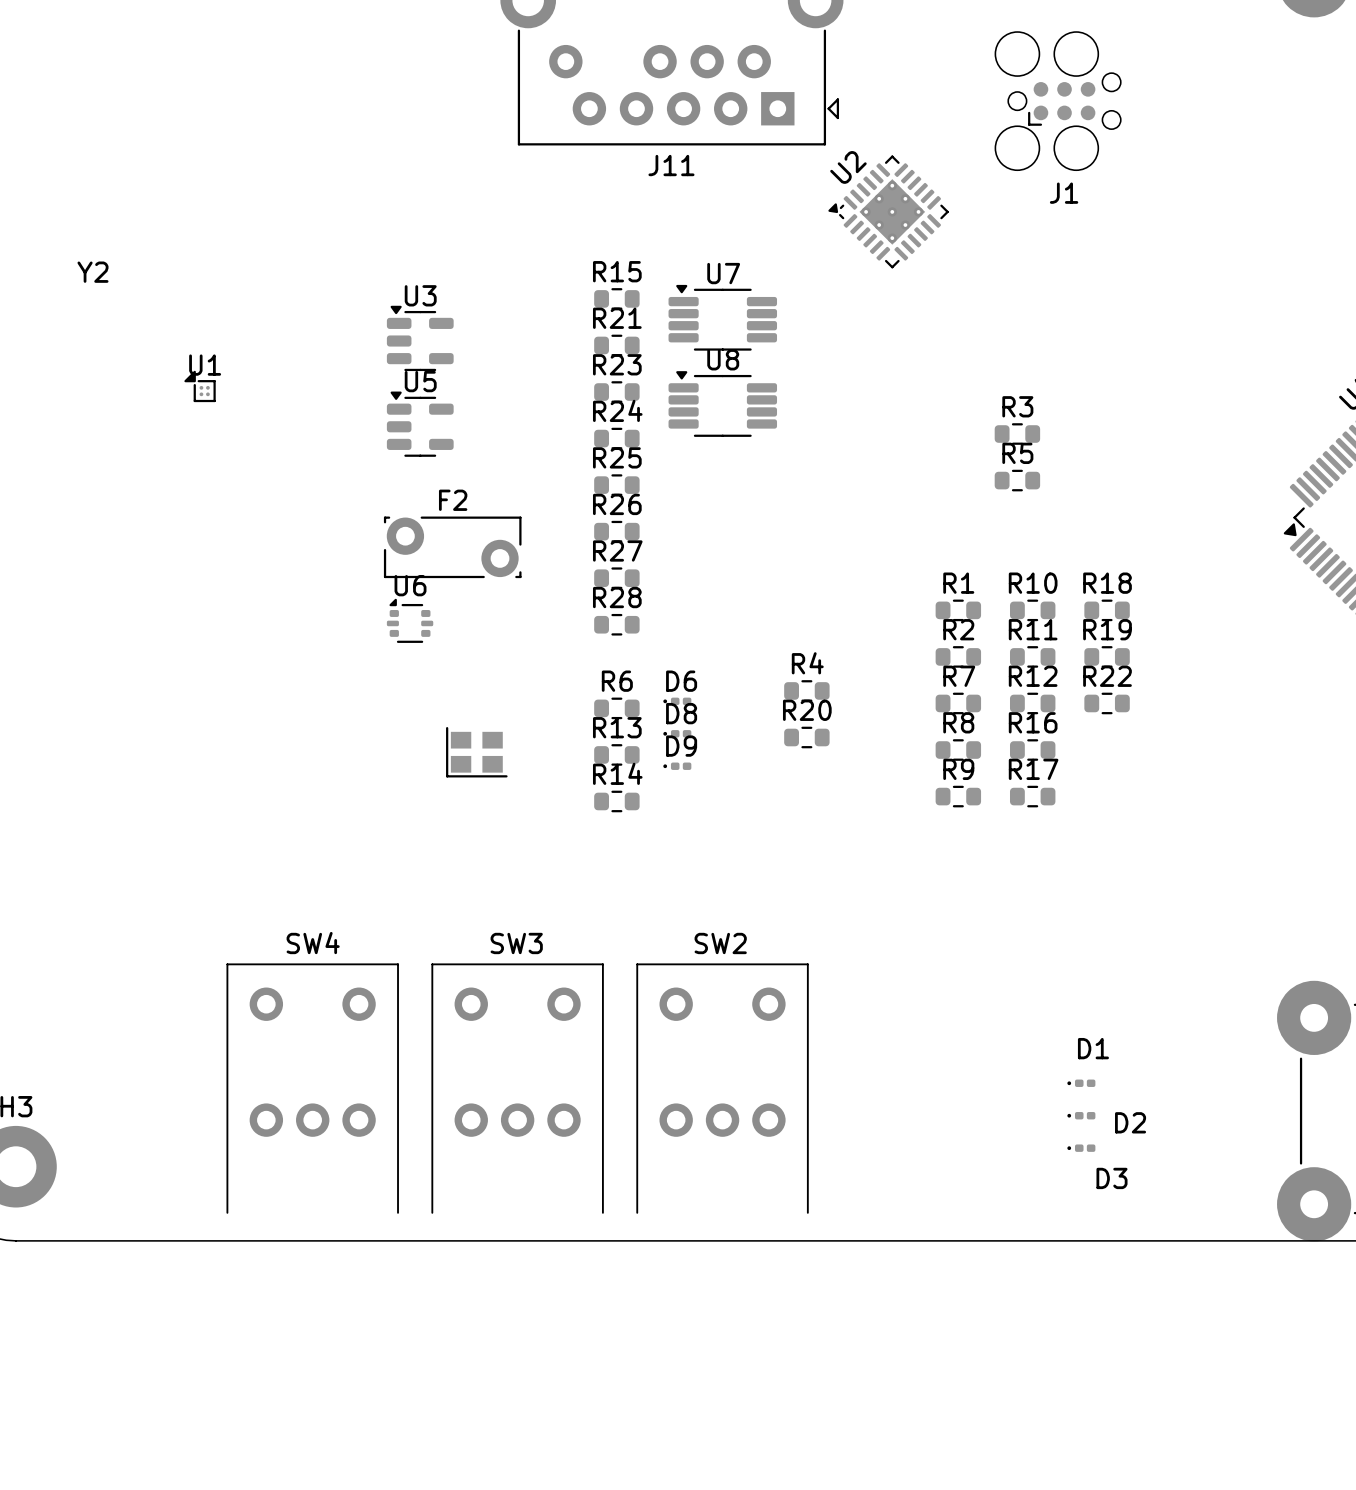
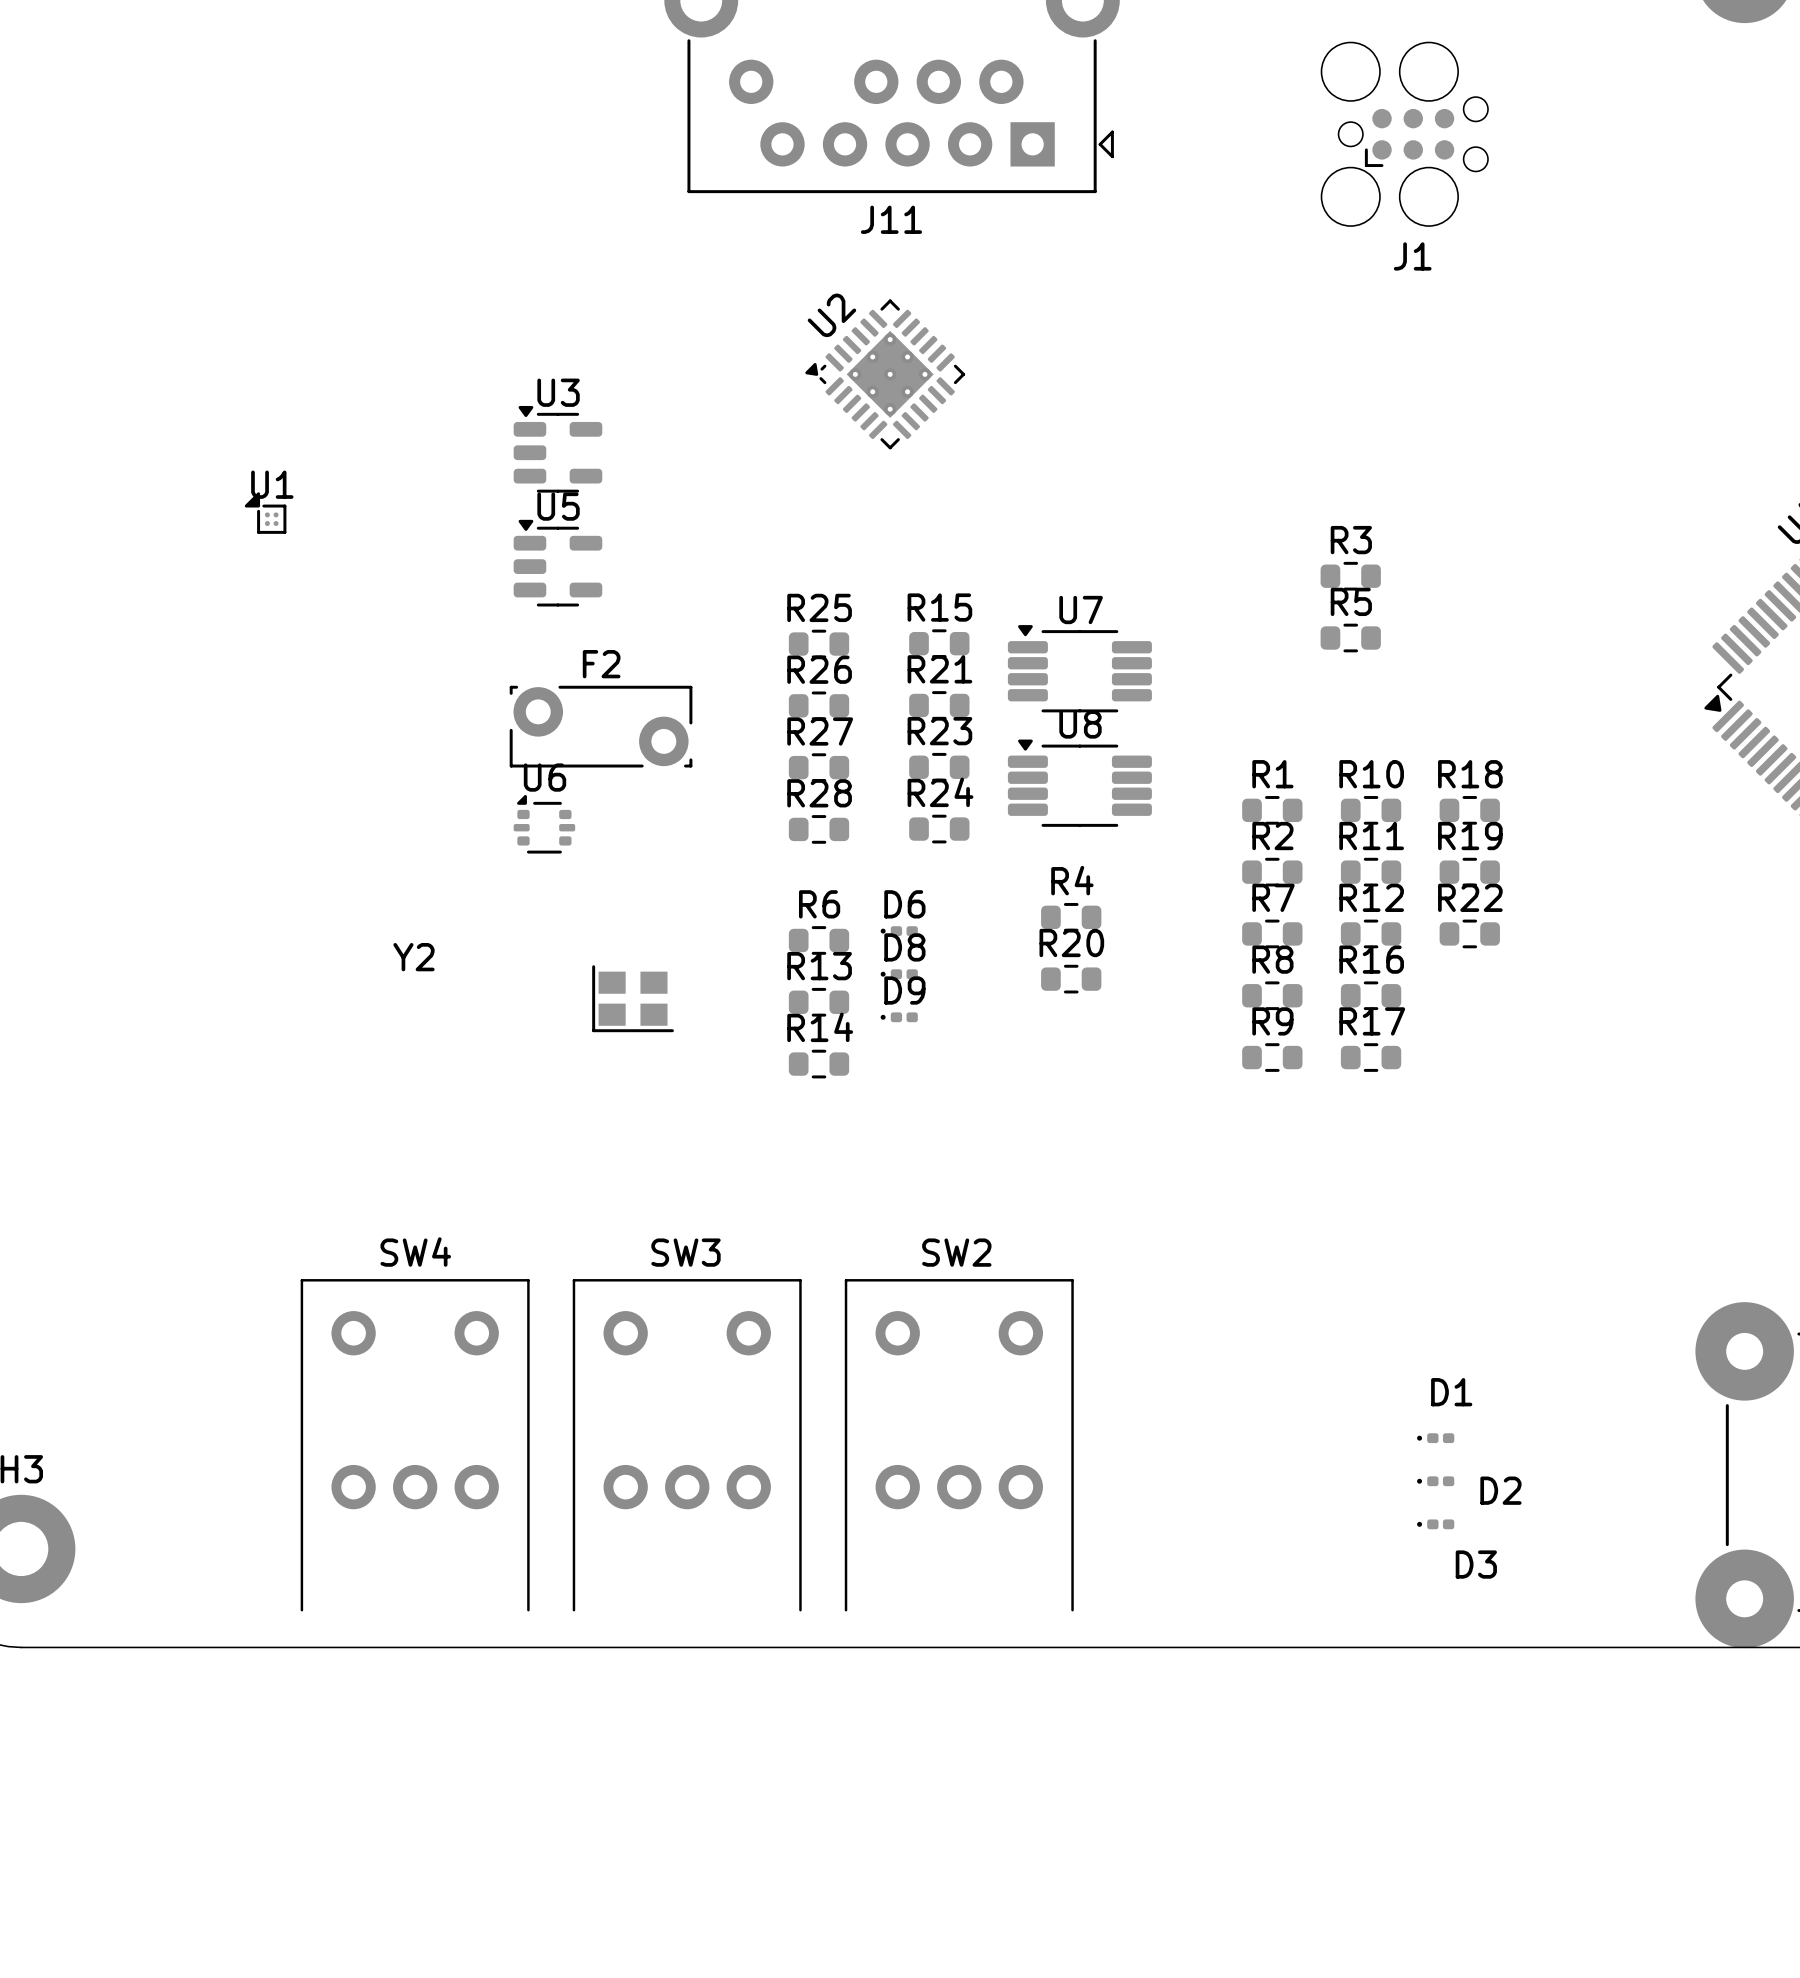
U2 position: (888, 211) -> (885, 374)
Y2 name position: Y2 (92, 272) -> Y2 (413, 957)
R15 position: (616, 298) -> (939, 643)
U7 position: (722, 317) -> (1079, 668)
R21 position: (616, 345) -> (939, 705)
R23 position: (616, 392) -> (939, 767)
U8 position: (722, 404) -> (1079, 783)
R24 position: (616, 438) -> (939, 829)

